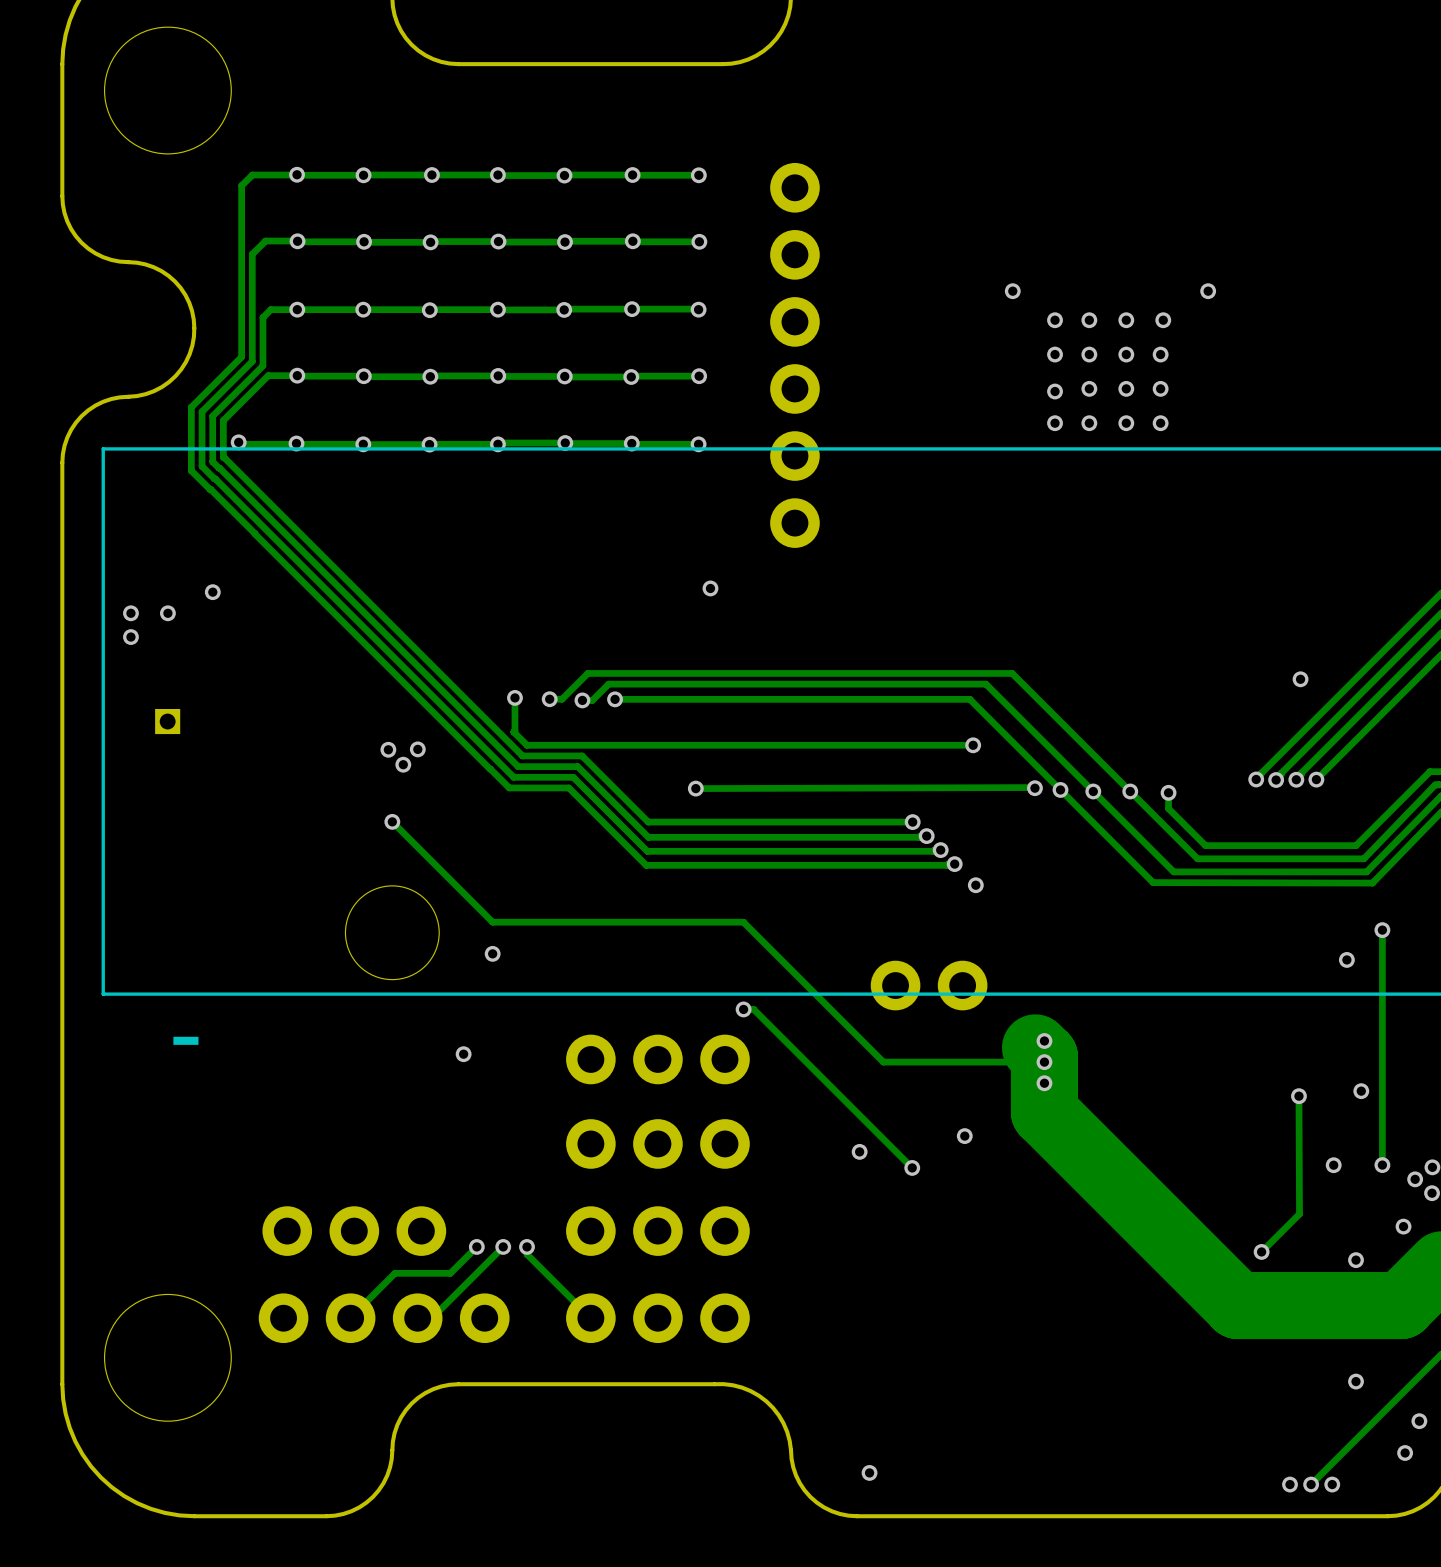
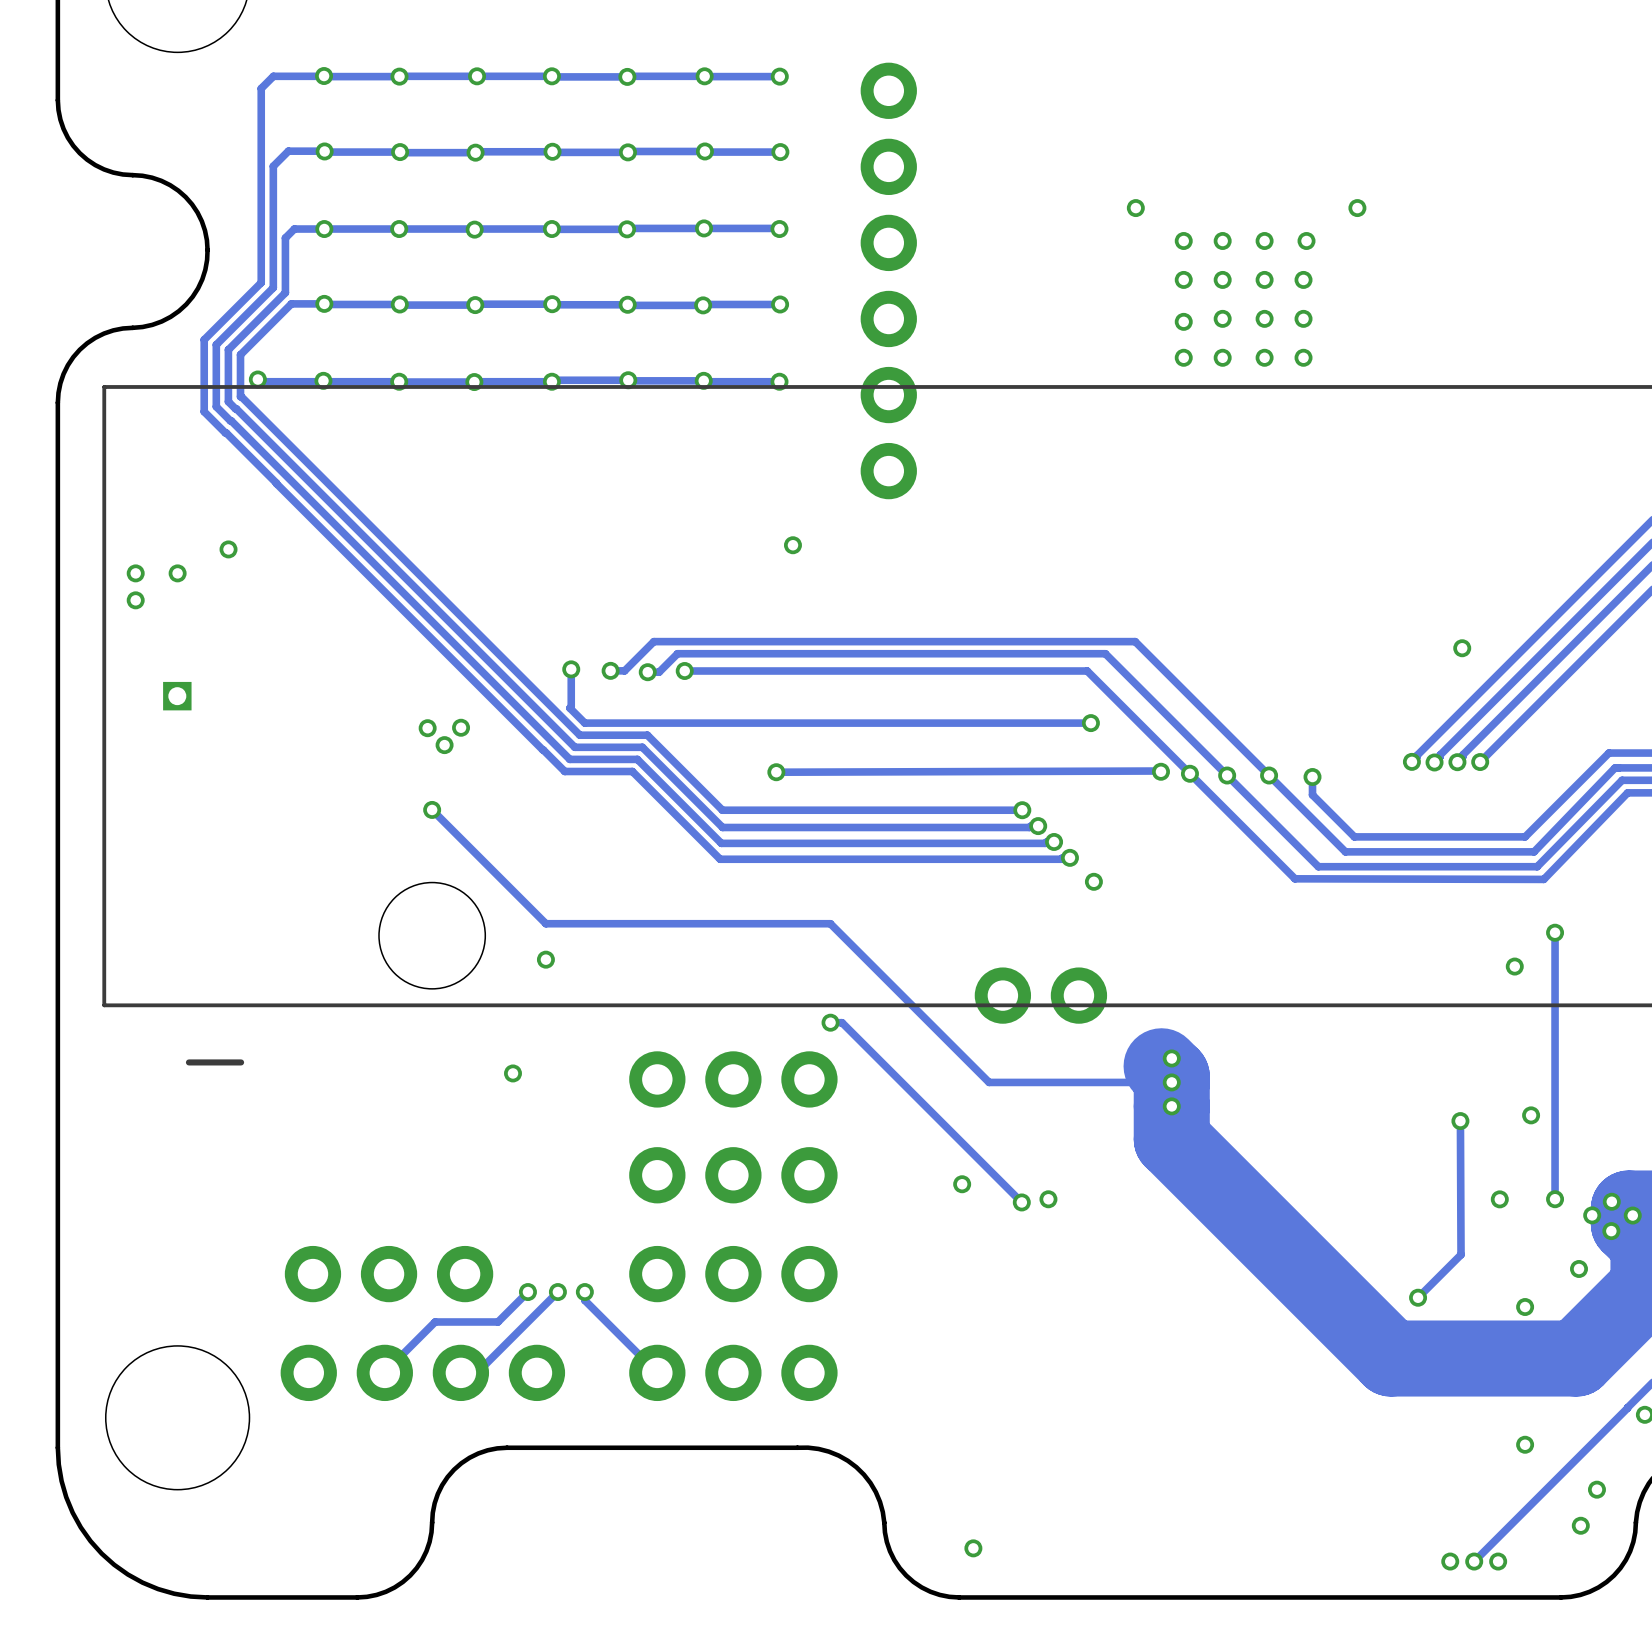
via position: (964, 1136) -> (1048, 1199)

